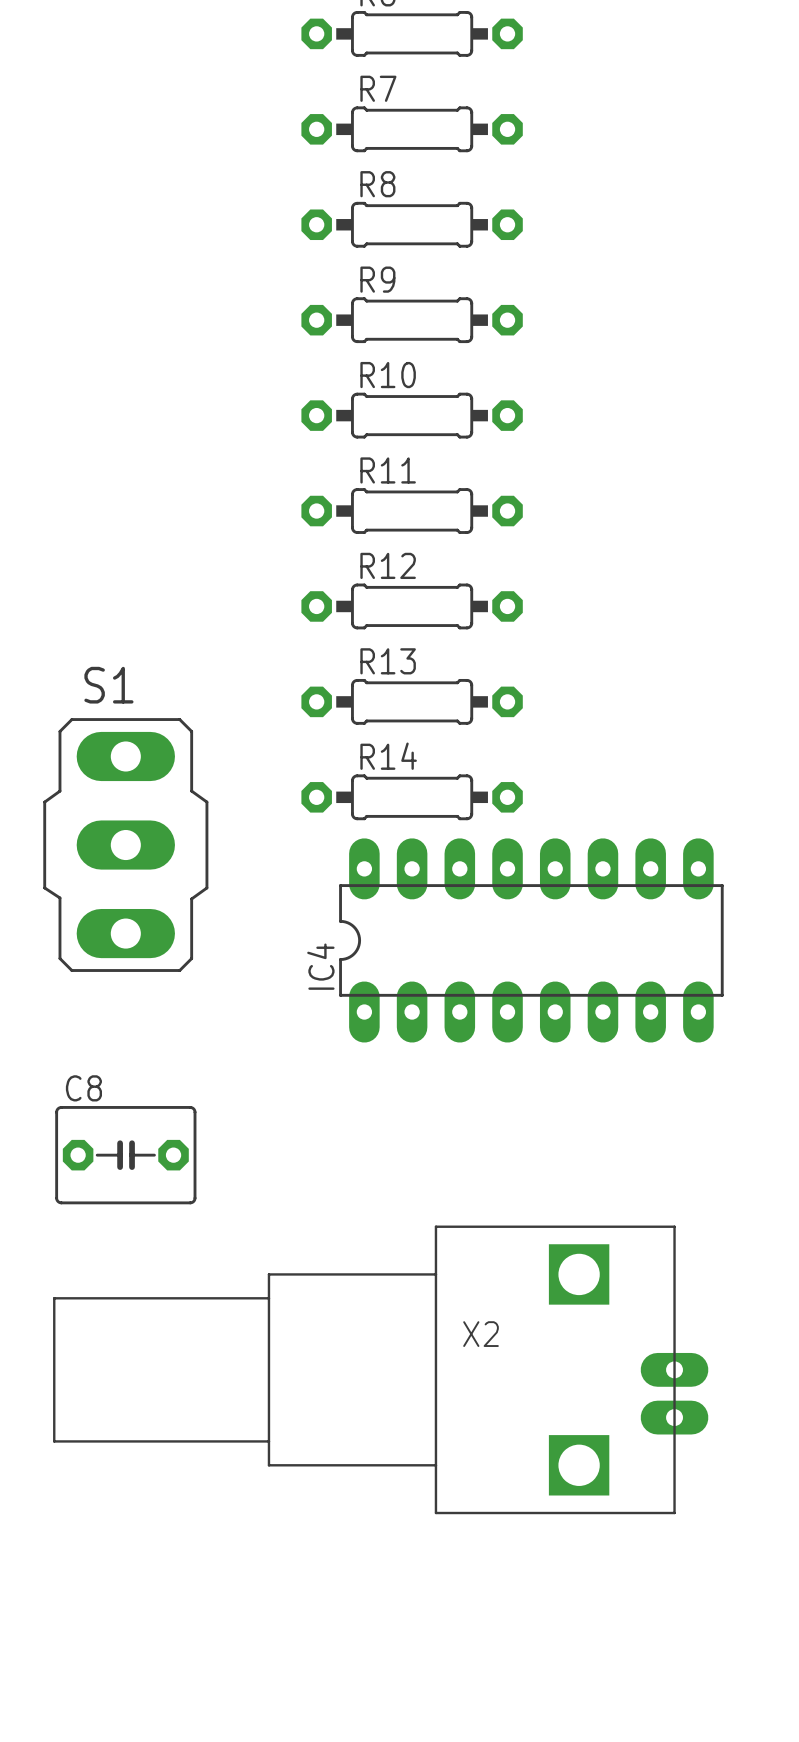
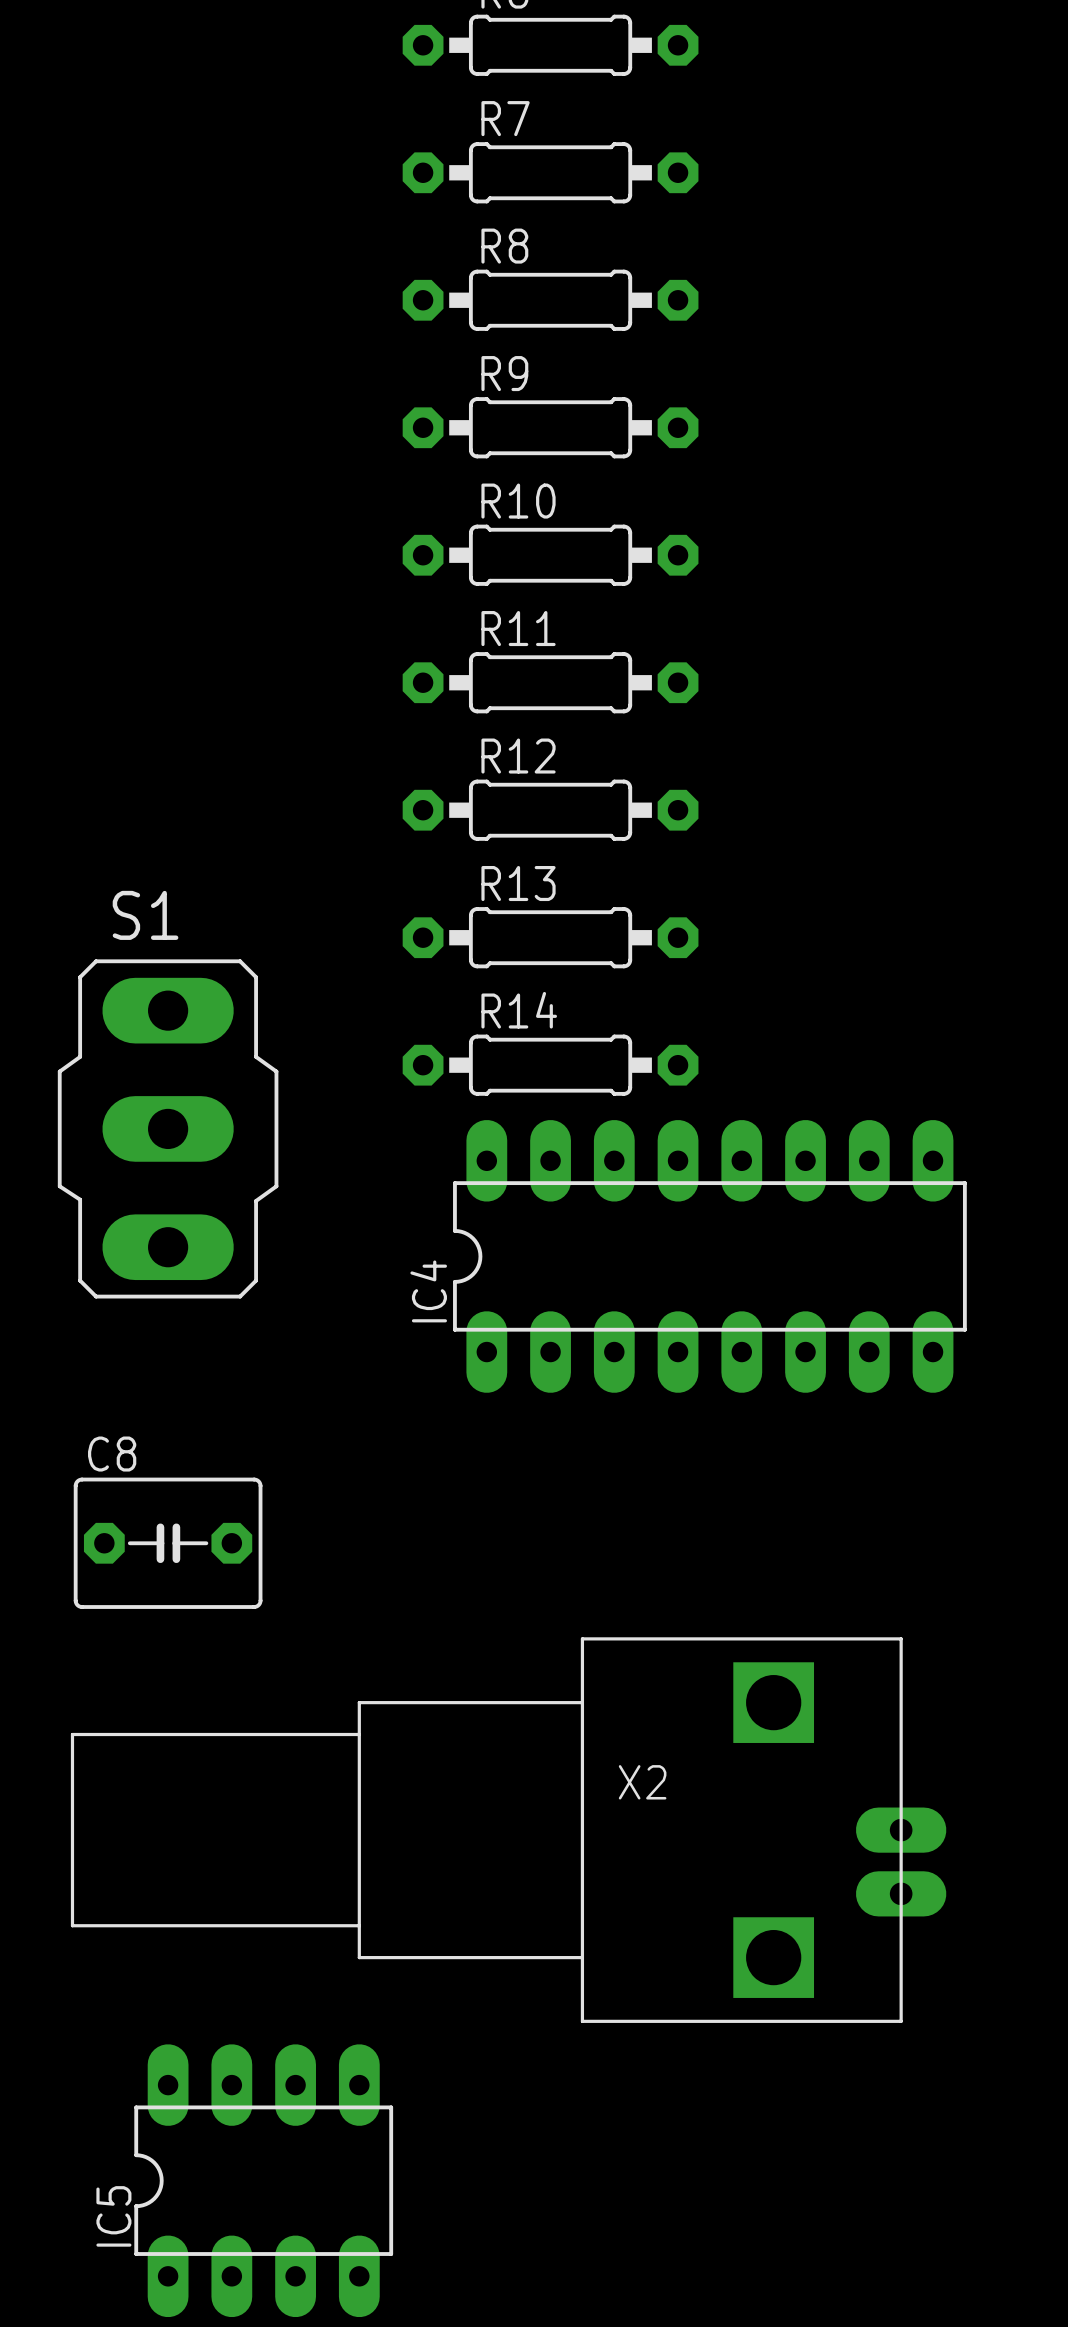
IC5: none -> (263, 2180)

